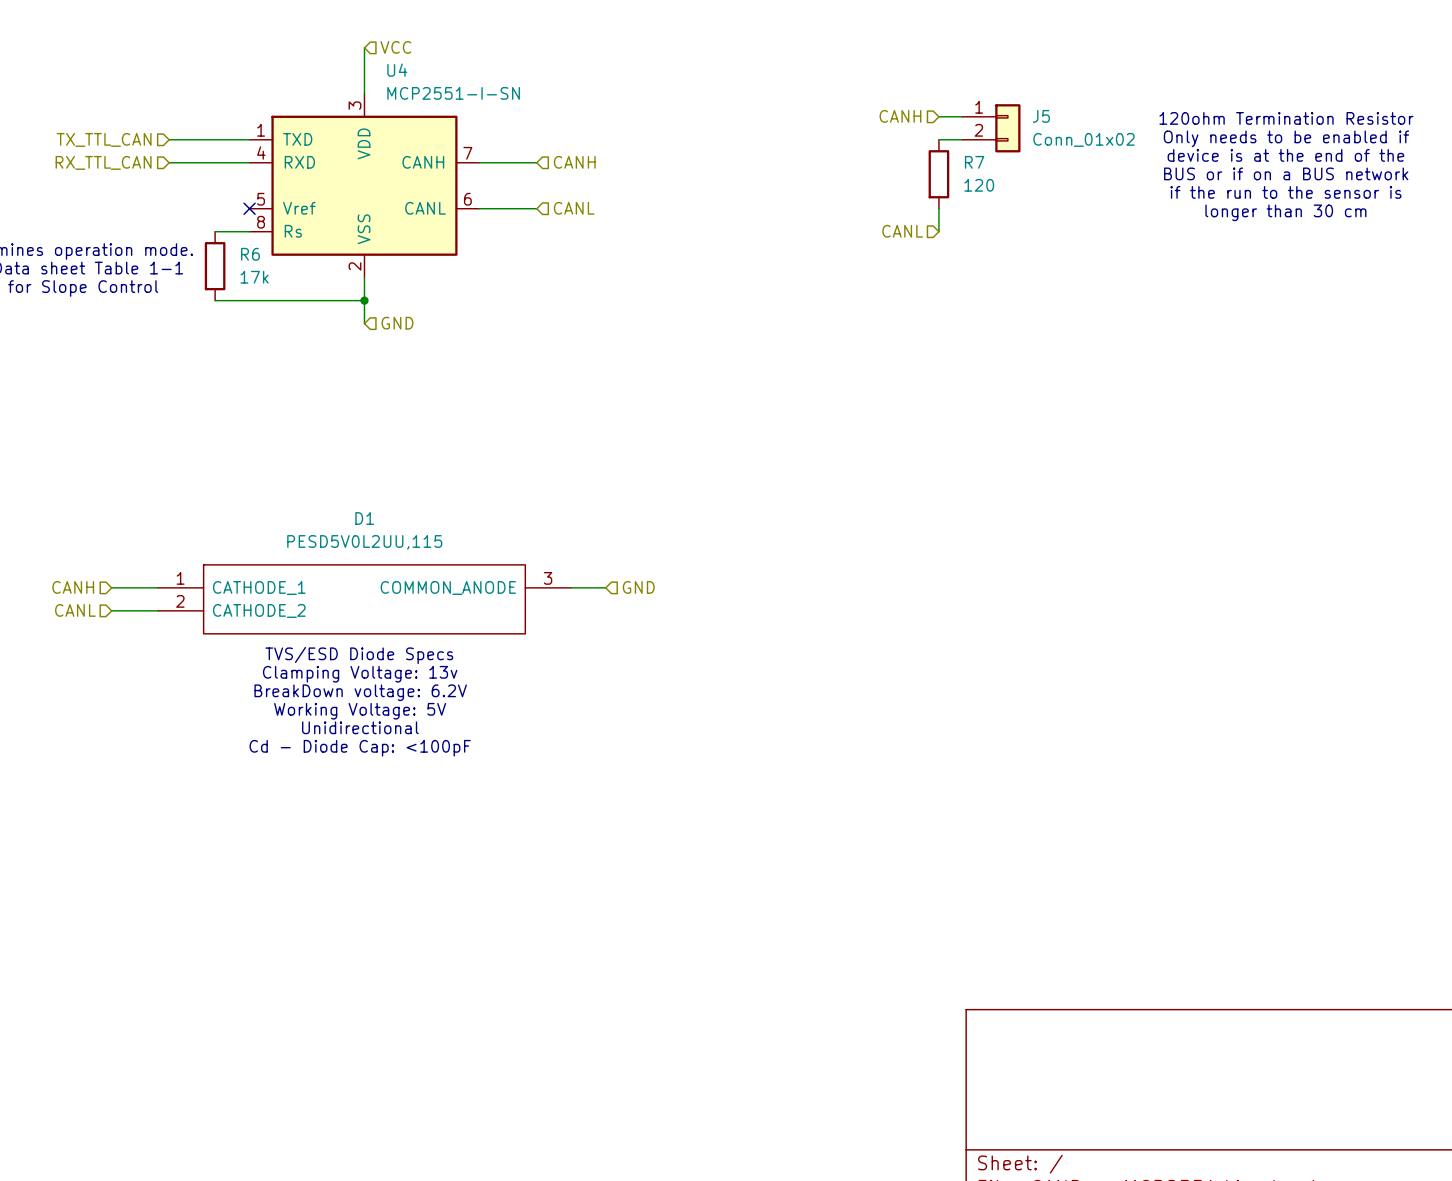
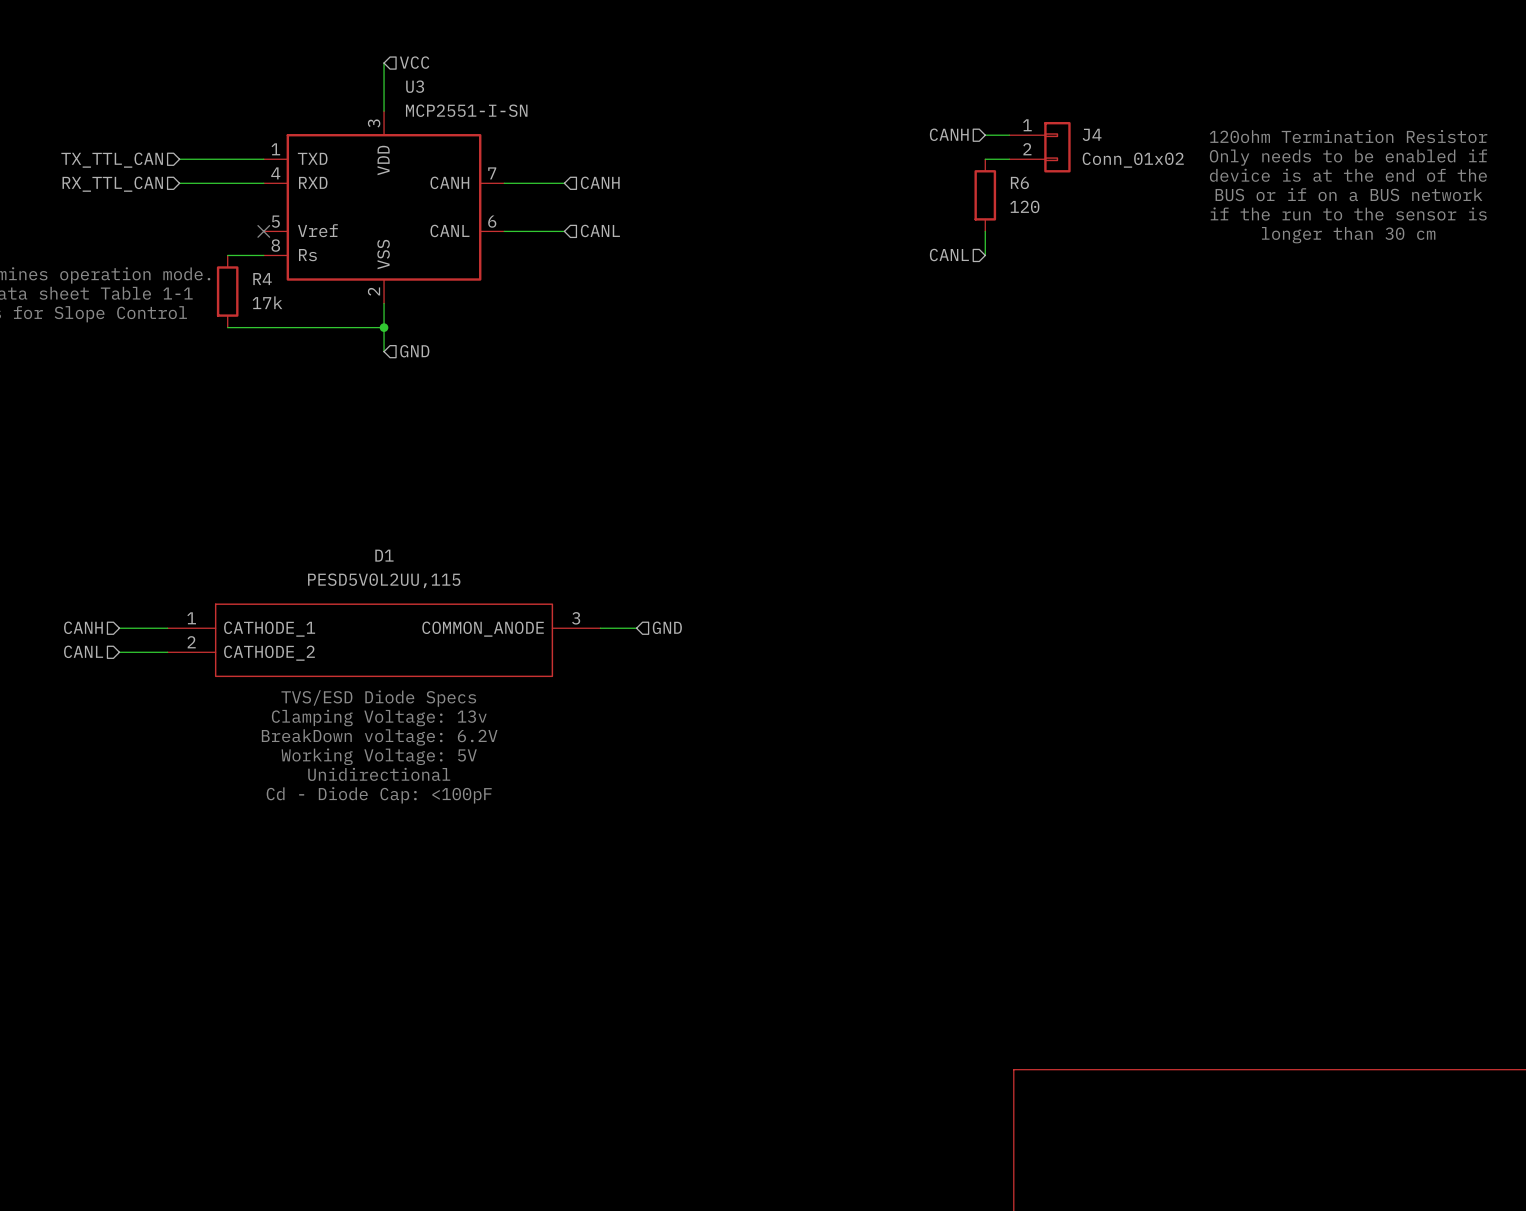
U4 name: U4 (397, 70) -> U3 (415, 86)
J5 name: J5 (1041, 116) -> J4 (1092, 134)
R7 name: R7 (974, 162) -> R6 (1019, 182)
R6 name: R6 (250, 254) -> R4 (262, 279)

